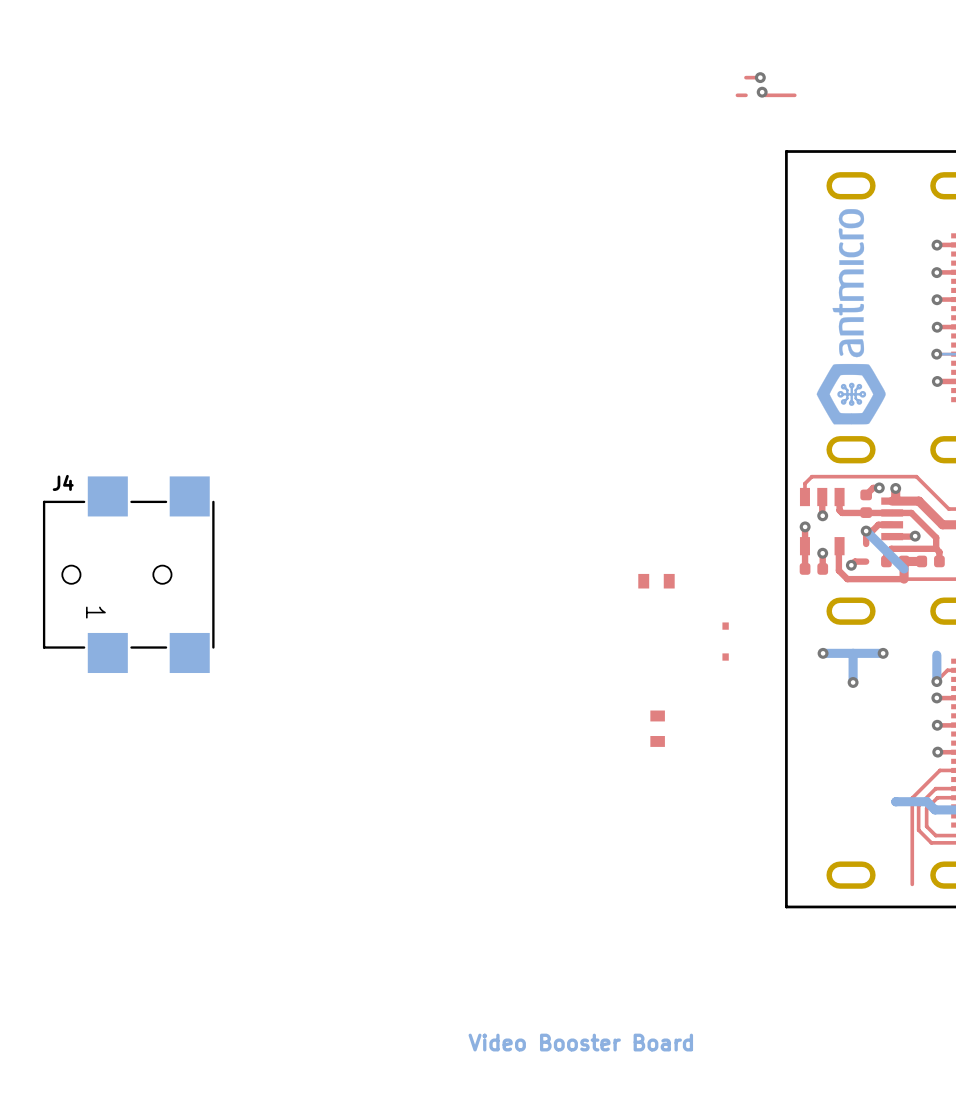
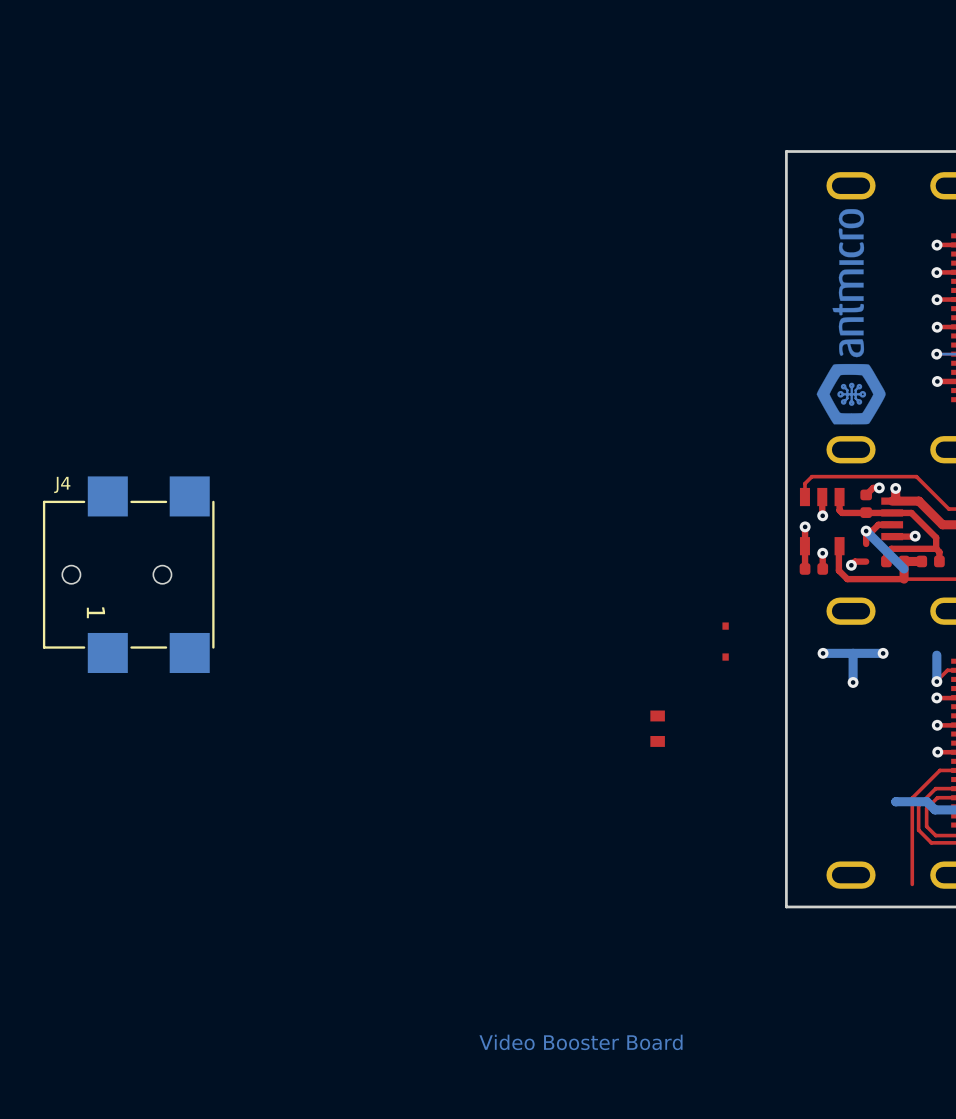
top track: (760, 77) (745, 77) -> none
via: (760, 77) -> none
top track: (762, 92) (765, 95) (794, 95) -> none
via: (762, 92) -> none
top track: (745, 95) (737, 95) -> none
part: (656, 581) -> none

